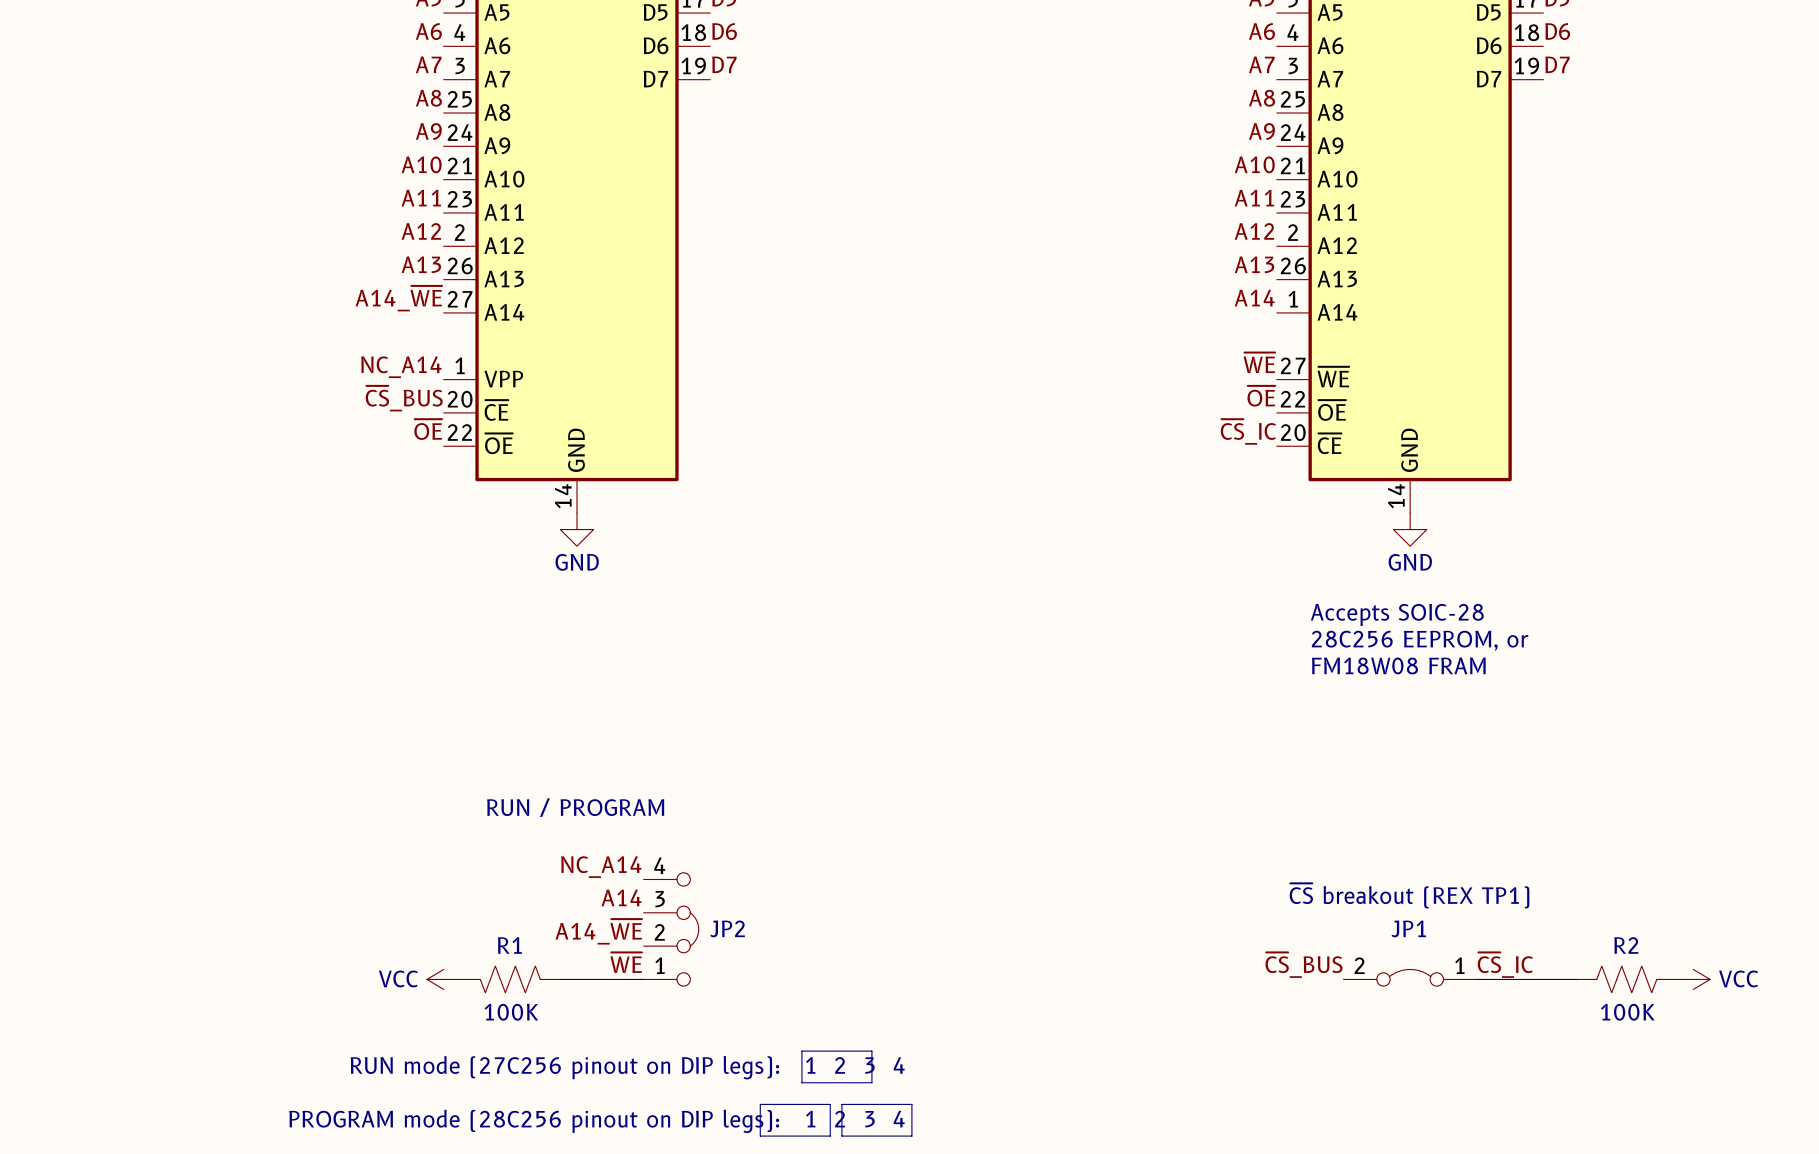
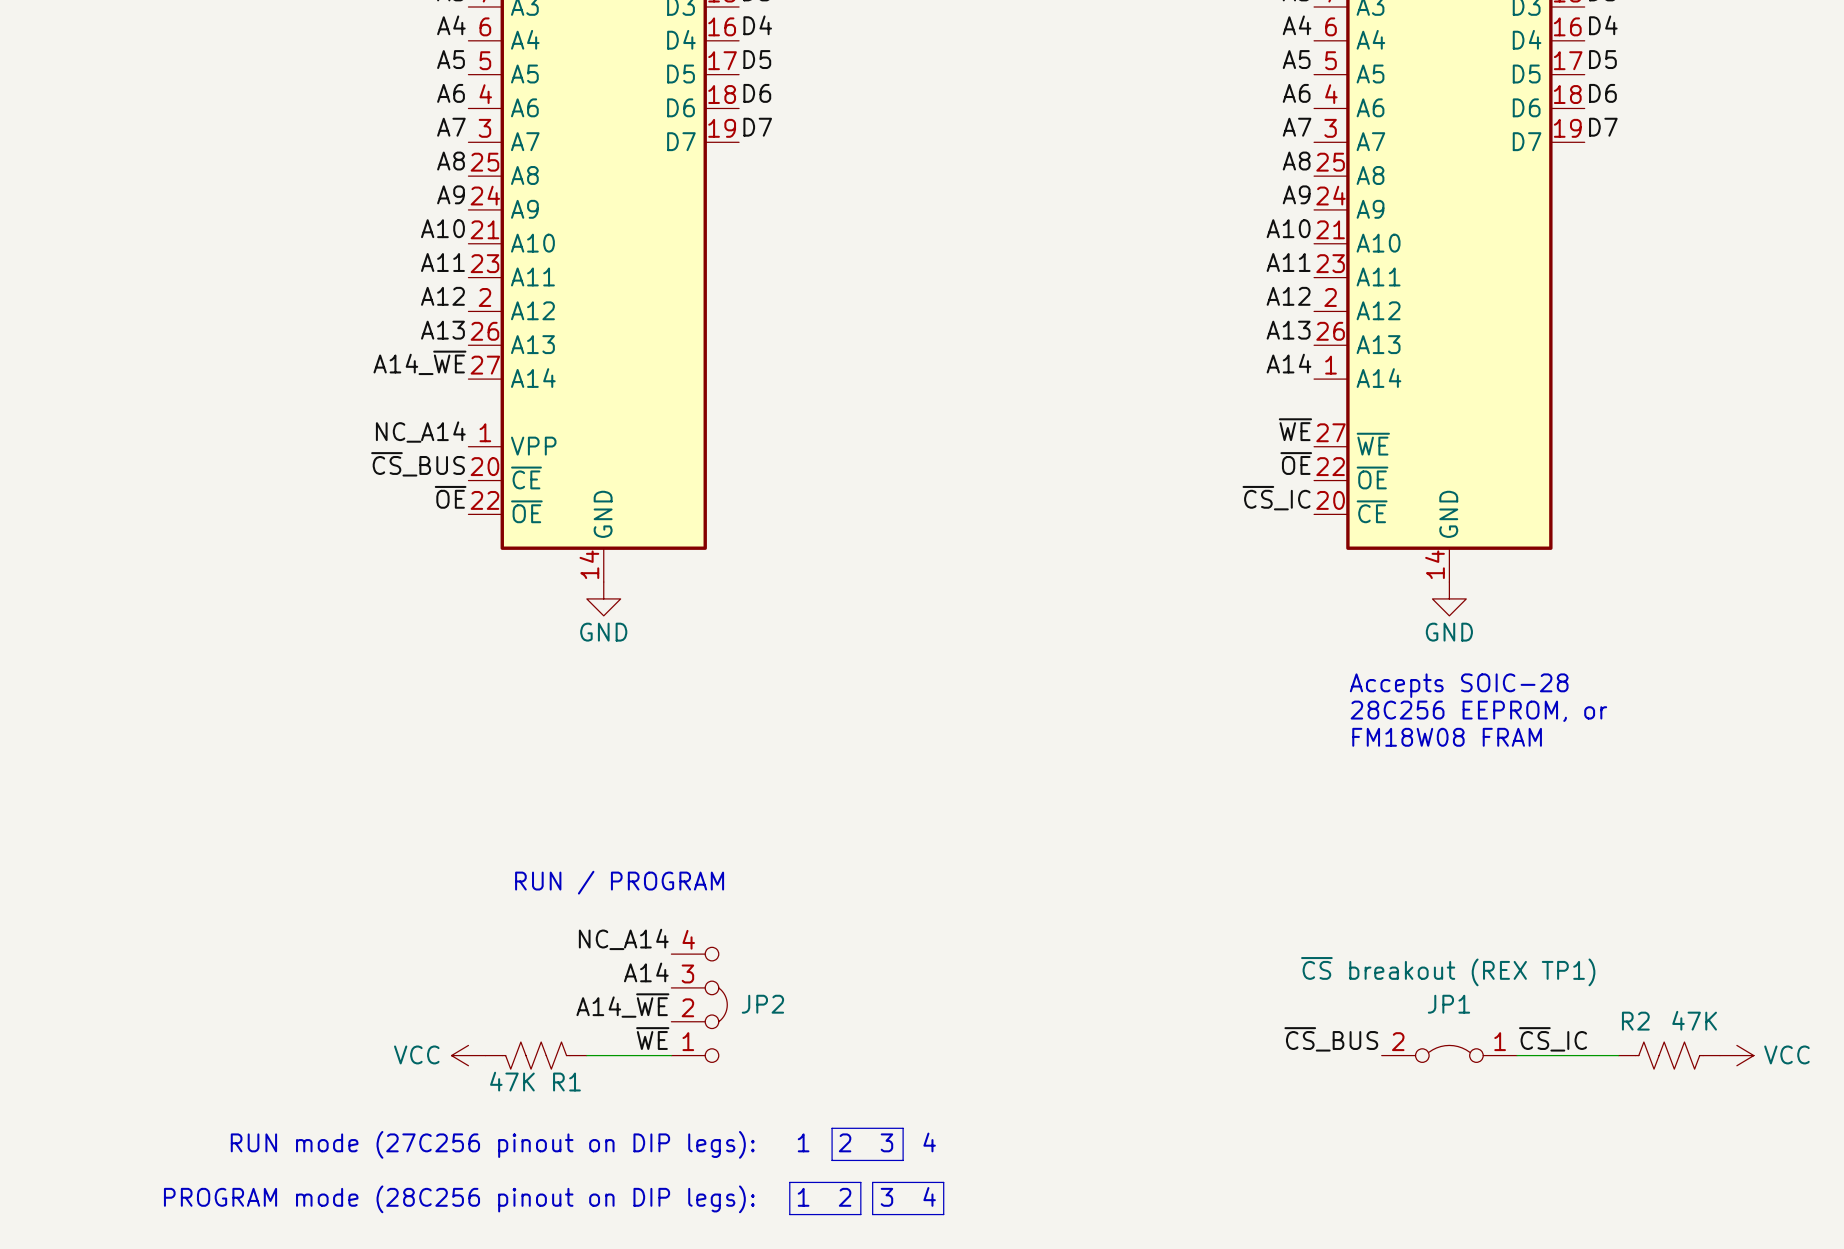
R1 name position: R1 (509, 945) -> R1 (566, 1082)
R2 name position: R2 (1626, 945) -> R2 (1635, 1021)
R1 value: 100K (511, 1012) -> 47K (512, 1081)
R2 value: 100K (1627, 1012) -> 47K (1694, 1020)

